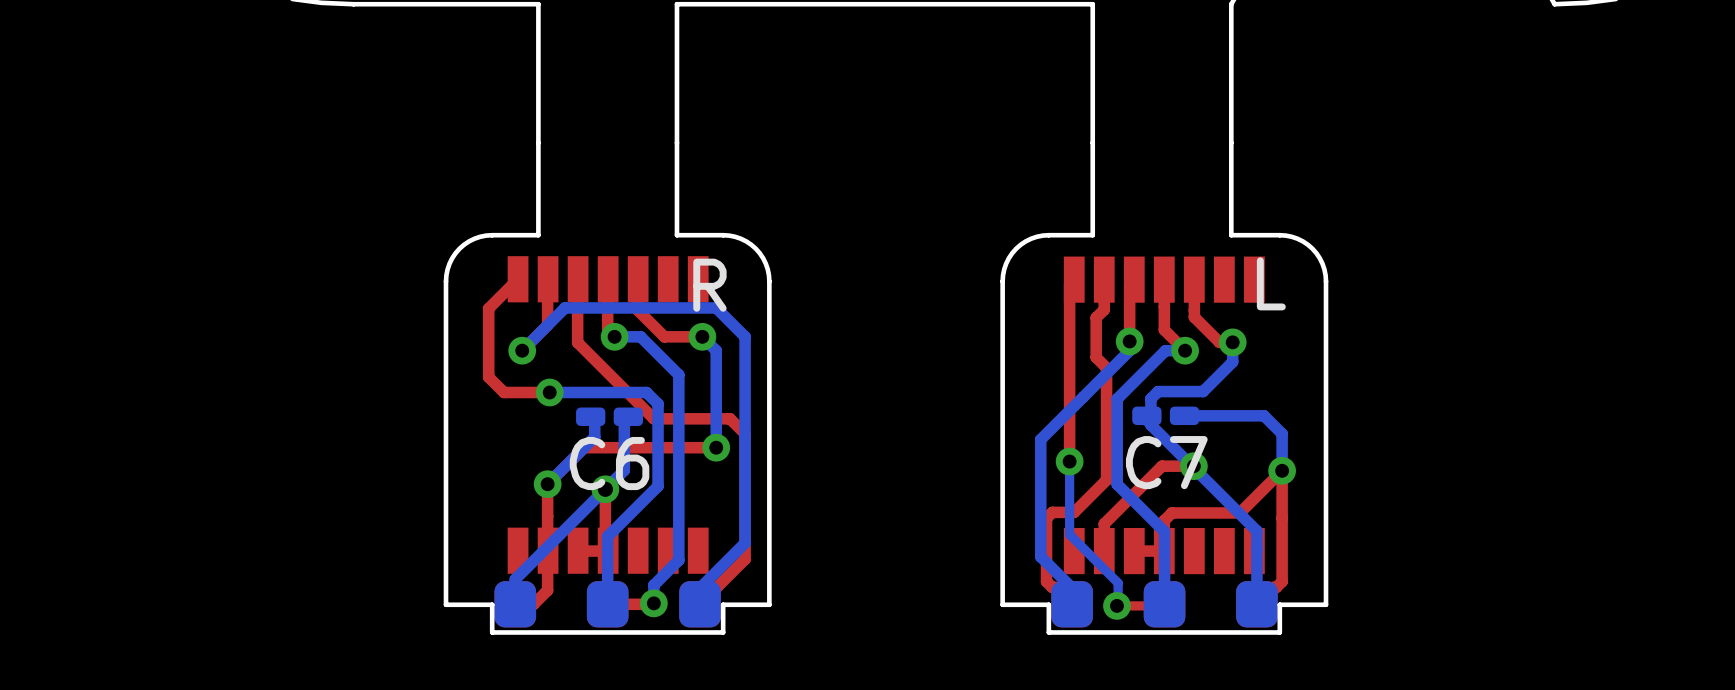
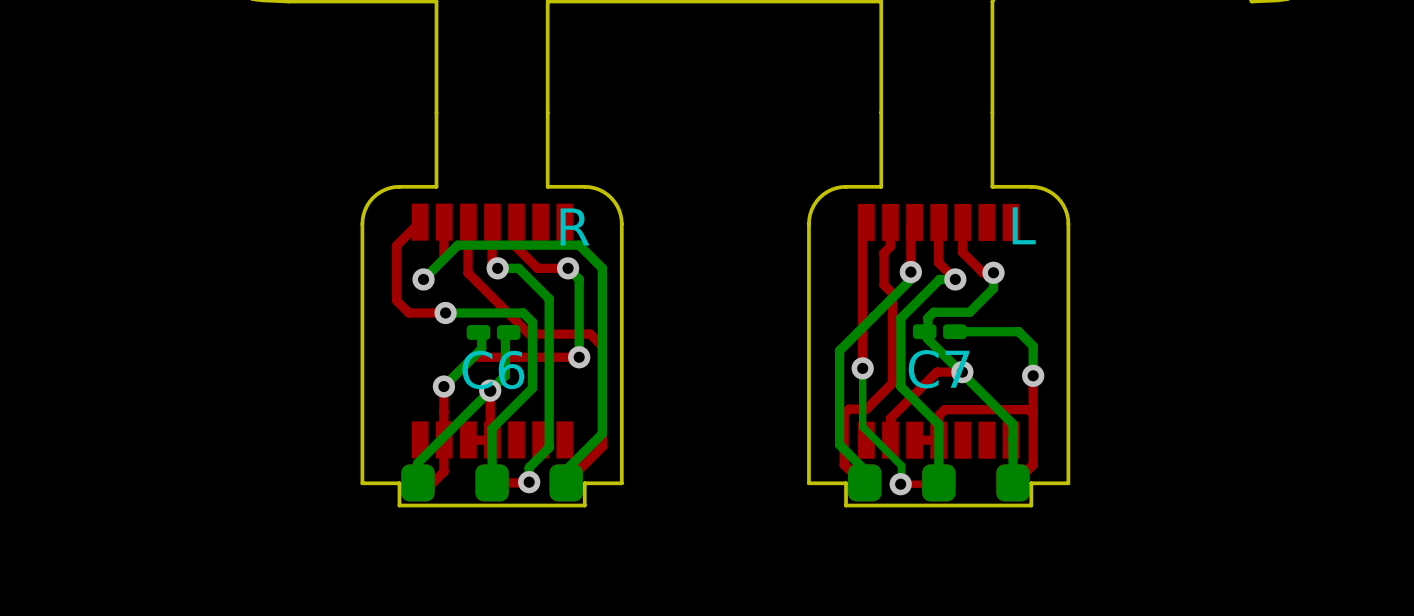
top track: (1282, 470) (1239, 512) -> (1033, 413) (1028, 409) (999, 409)

